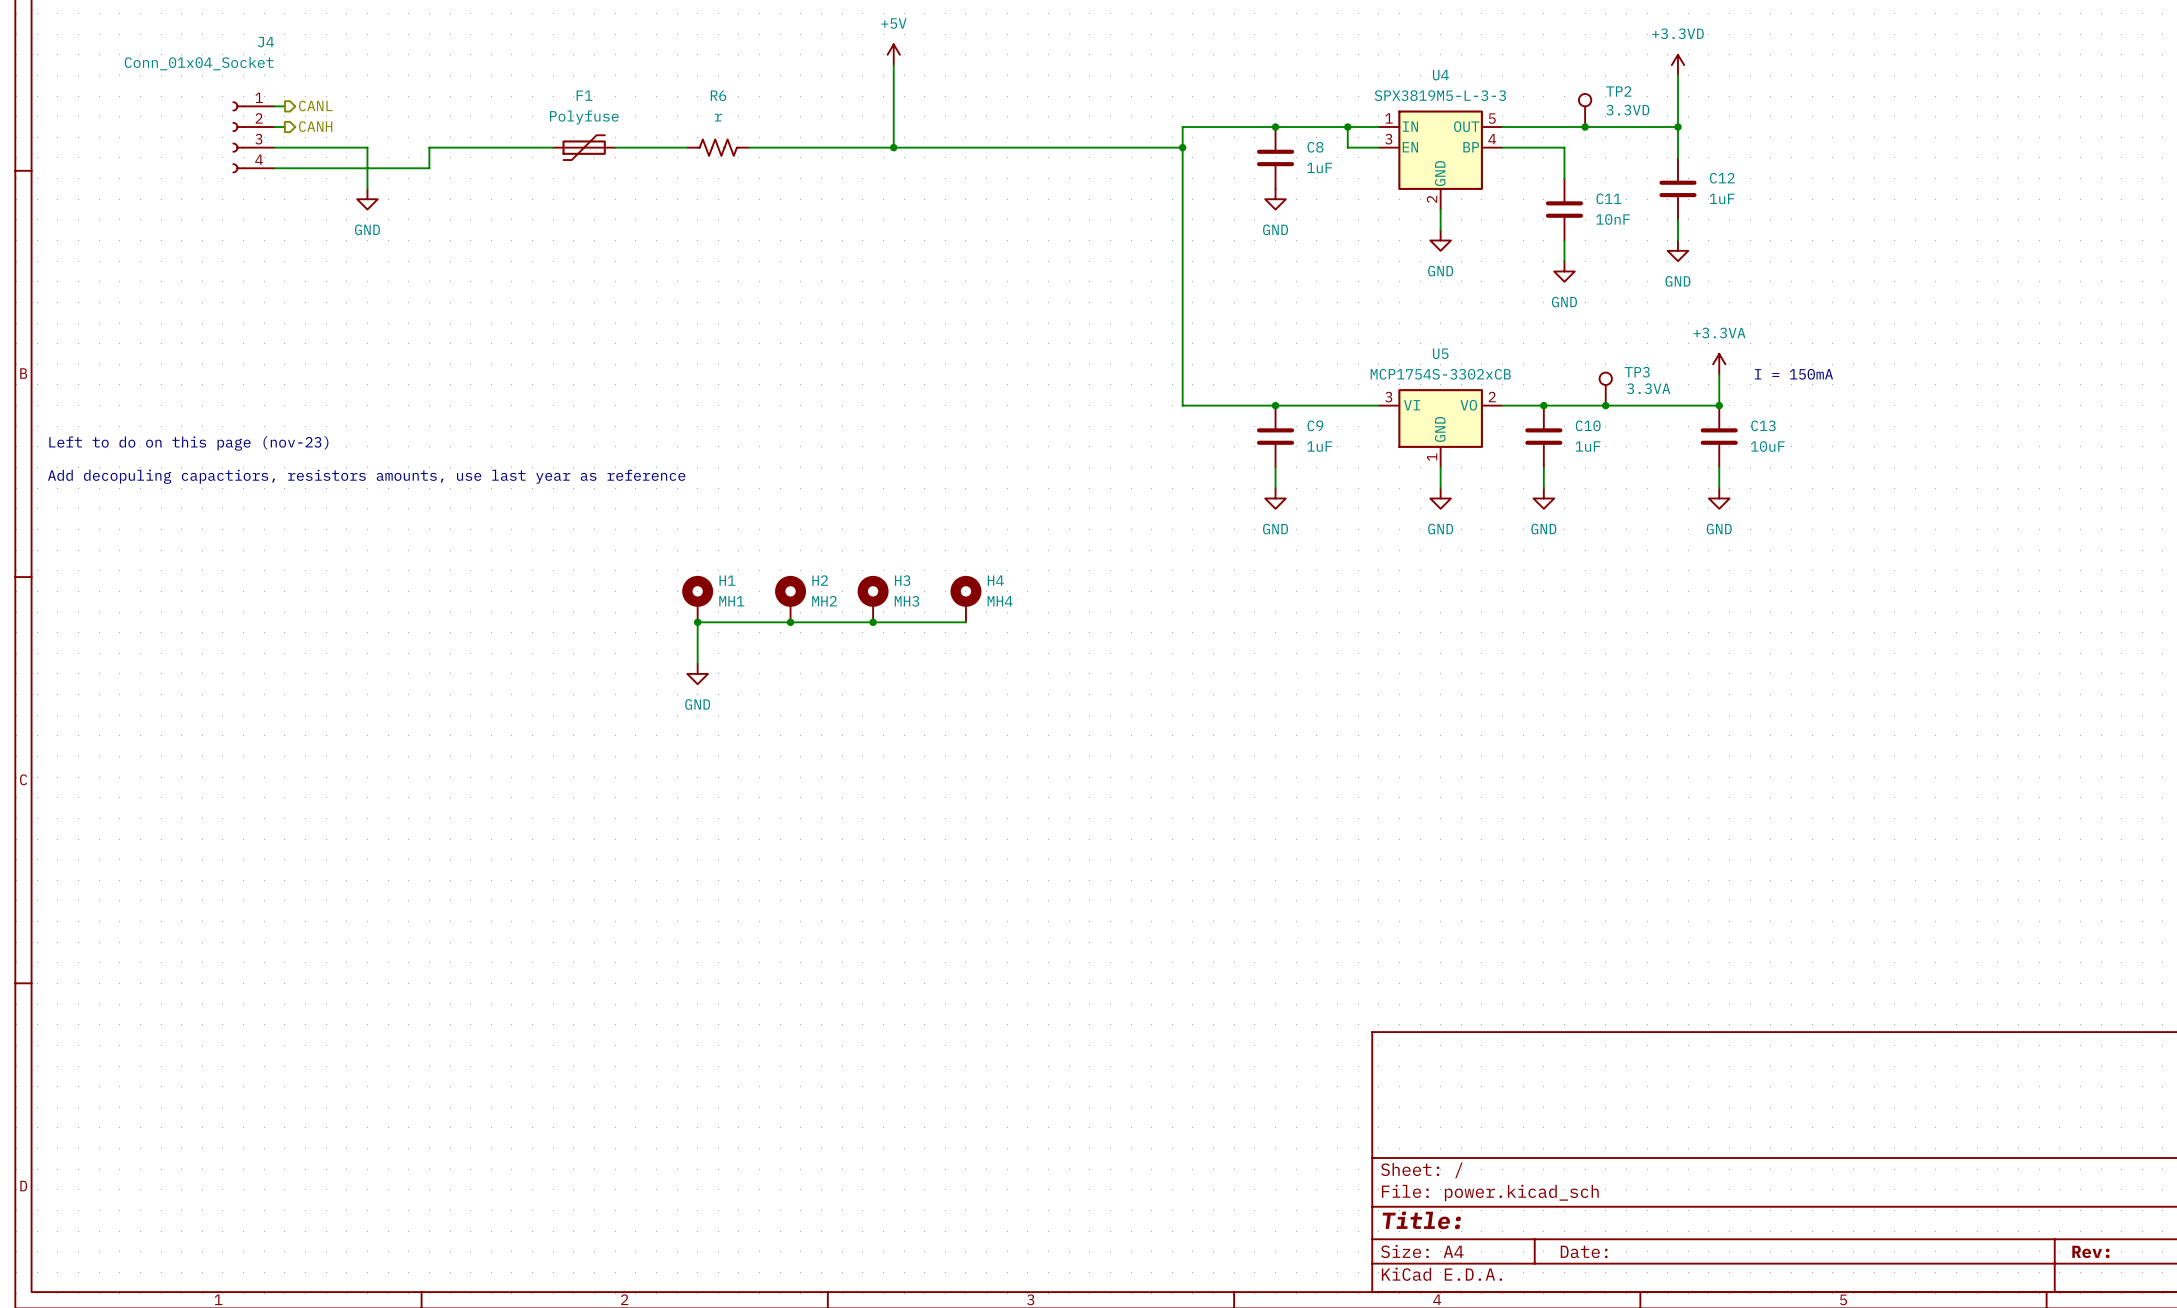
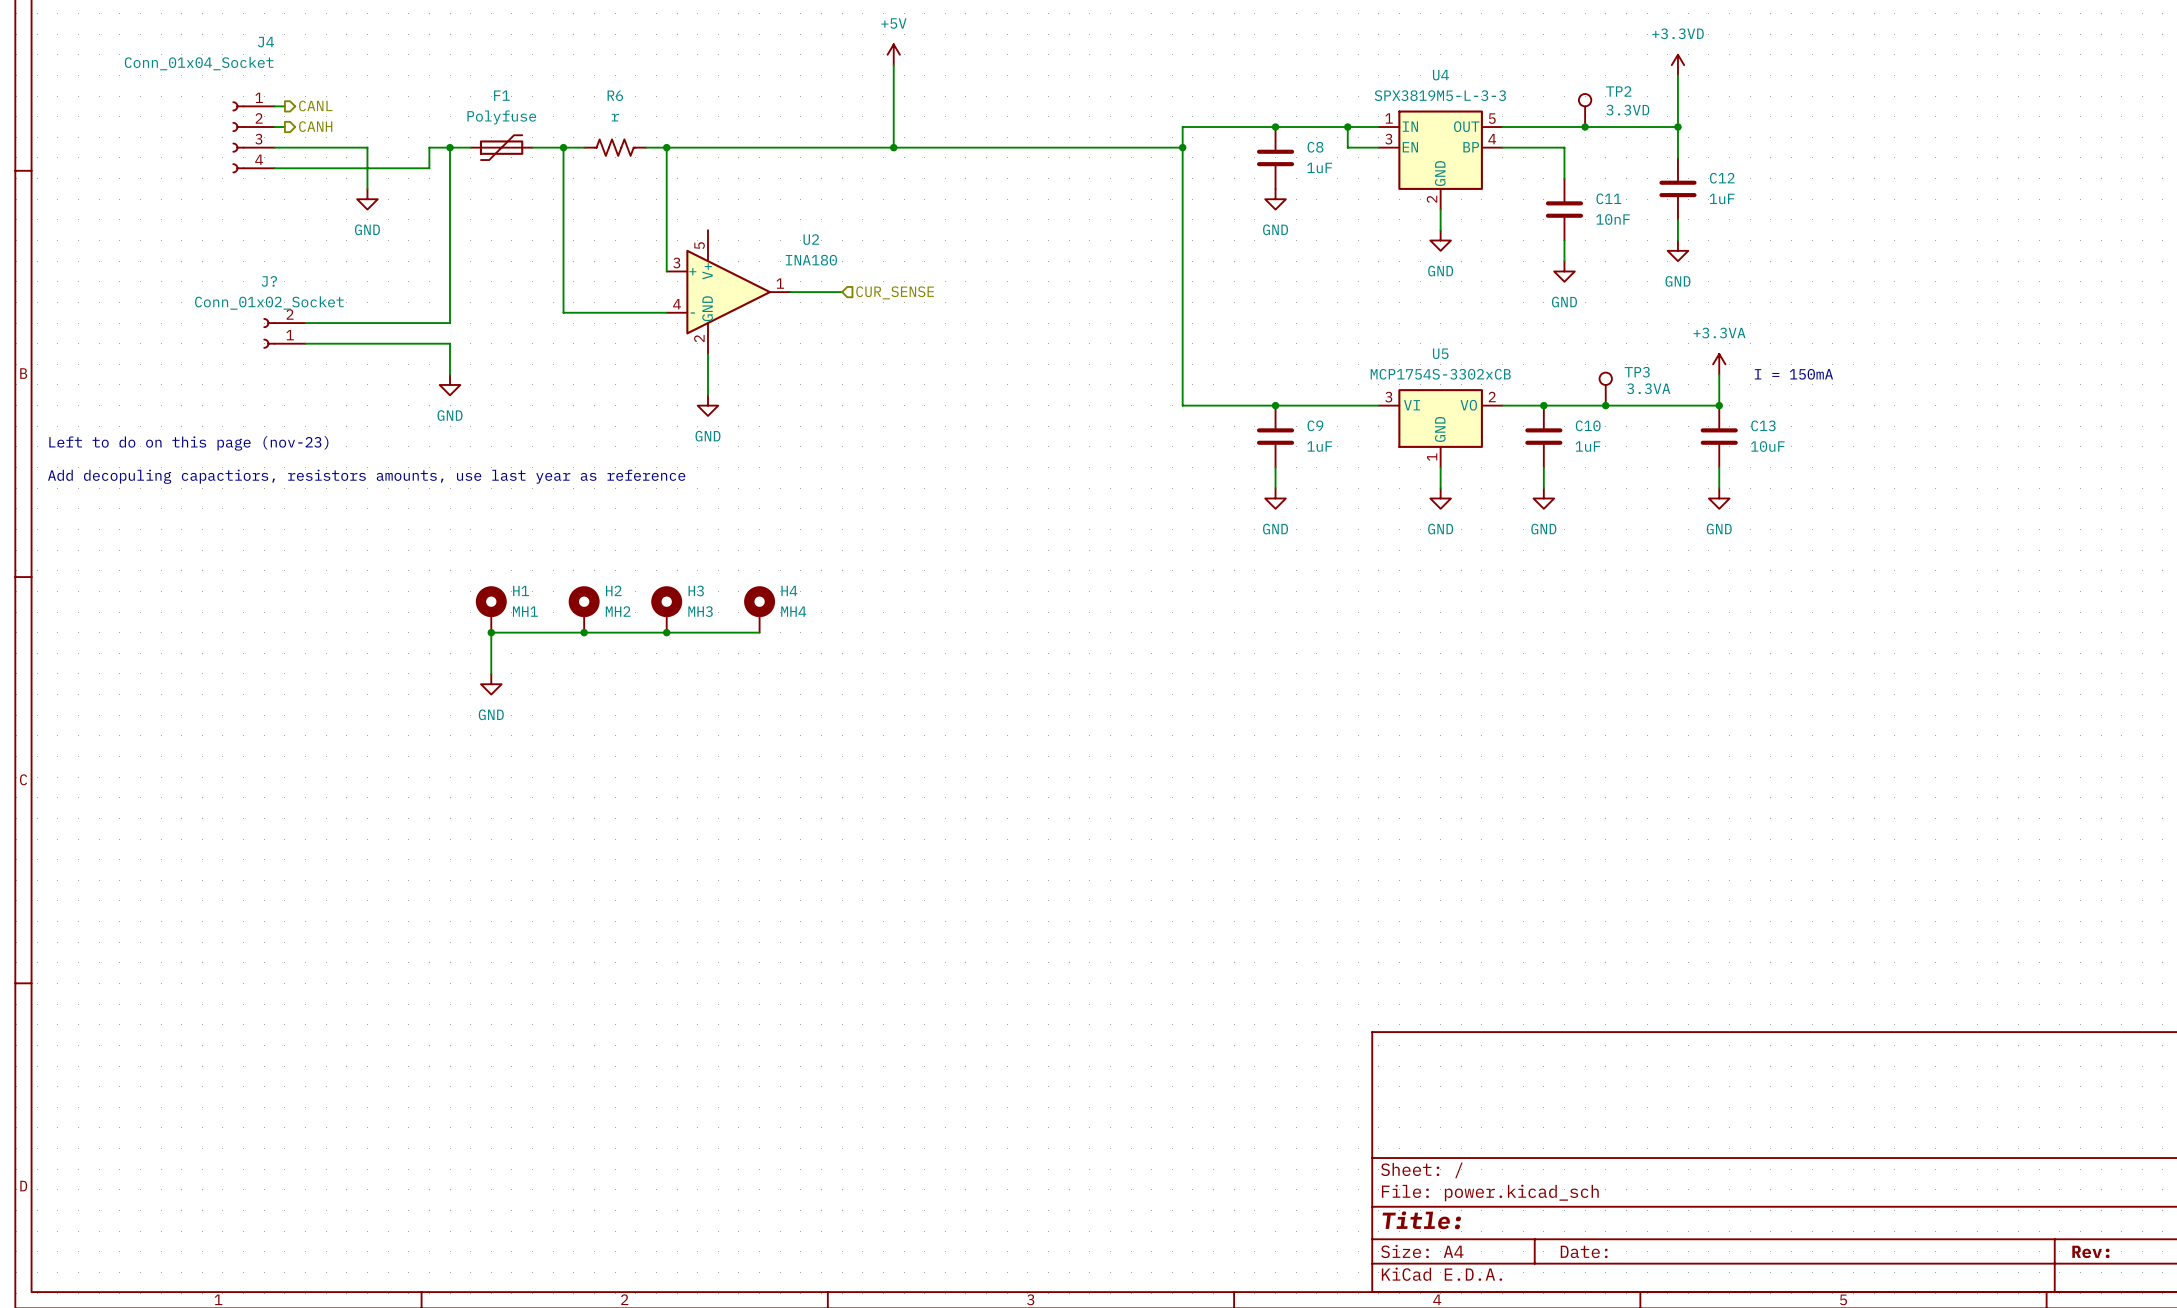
wire: none -> (450, 147) (450, 323) (305, 323)
junction: none -> (450, 147)
wire: none -> (563, 147) (563, 312) (666, 312)
junction: none -> (563, 147)
F1 position: (584, 147) -> (501, 147)
wire: none -> (666, 147) (666, 271)
junction: none -> (666, 147)
R6 position: (718, 147) -> (615, 147)
U2: none -> INA180 (728, 292)
wire: none -> (790, 292) (842, 292)
hierarchical label: none -> CUR_SENSE (895, 292)
J?: none -> Conn_01x02_Socket (284, 333)
wire: none -> (305, 343) (450, 343) (450, 374)
wire: none -> (707, 354) (707, 395)
power symbol: none -> GND (450, 384)
power symbol: none -> GND (707, 405)
H1 position: (697, 599) -> (491, 609)
H2 position: (790, 599) -> (584, 609)
H3 position: (873, 599) -> (666, 609)
H4 position: (965, 599) -> (759, 609)
junction position: (697, 622) -> (666, 632)
junction: (790, 622) -> none
junction: (873, 622) -> none
wire: (965, 622) (697, 622) (697, 663) -> none
junction: none -> (491, 632)
junction: none -> (584, 632)
wire: none -> (759, 632) (491, 632) (491, 673)
power symbol: GND (697, 673) -> none
power symbol: none -> GND (491, 684)

